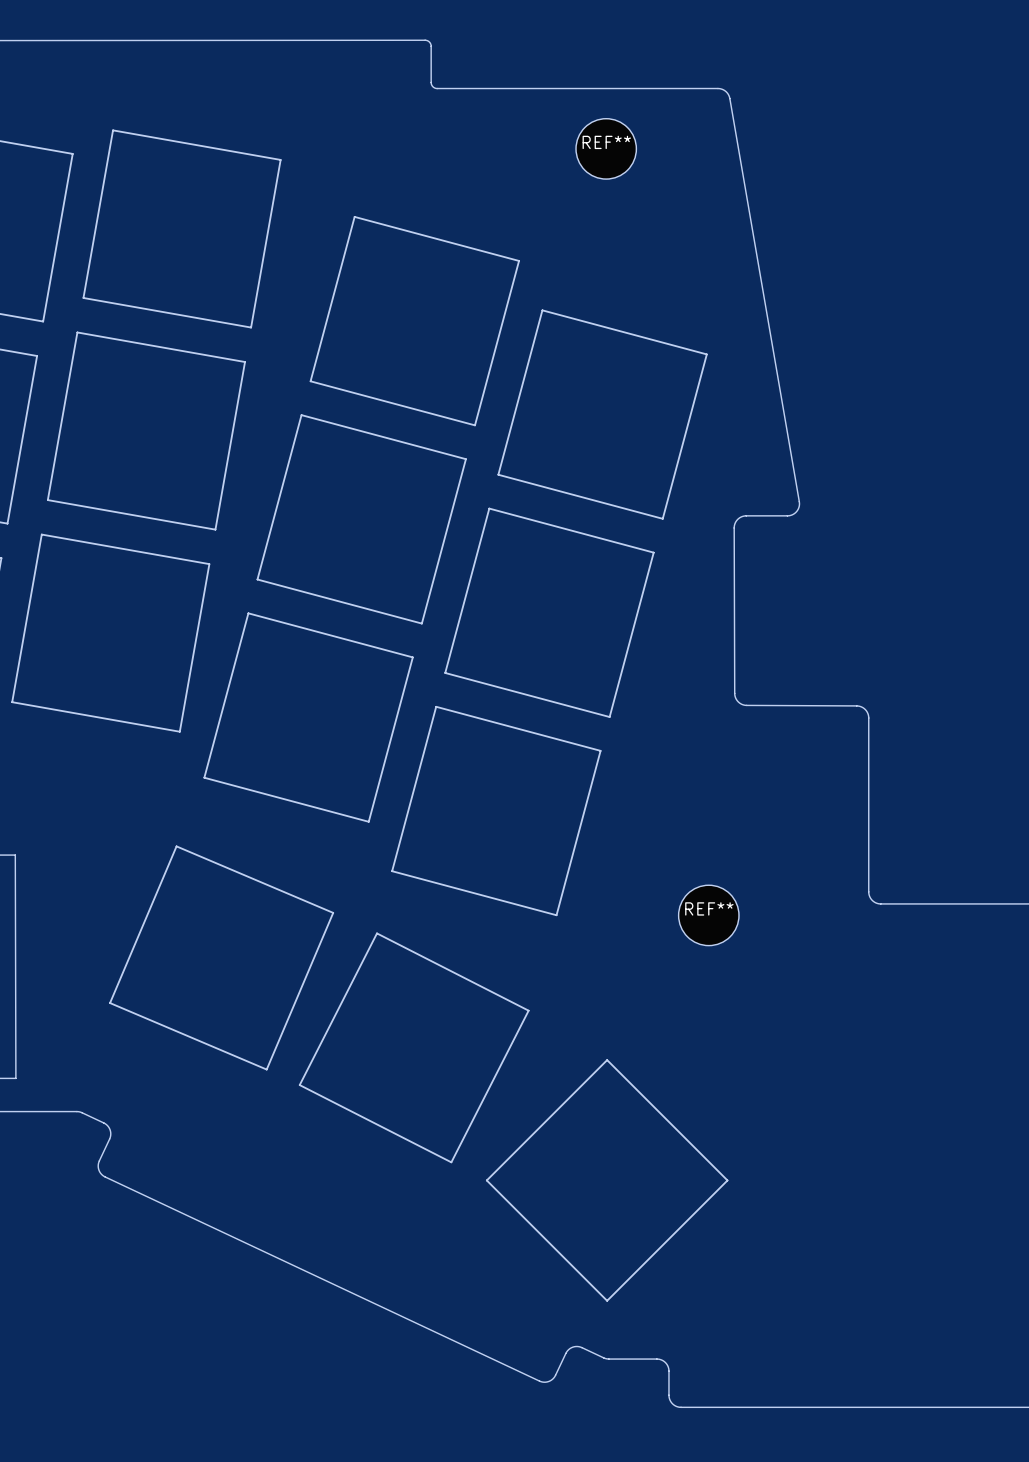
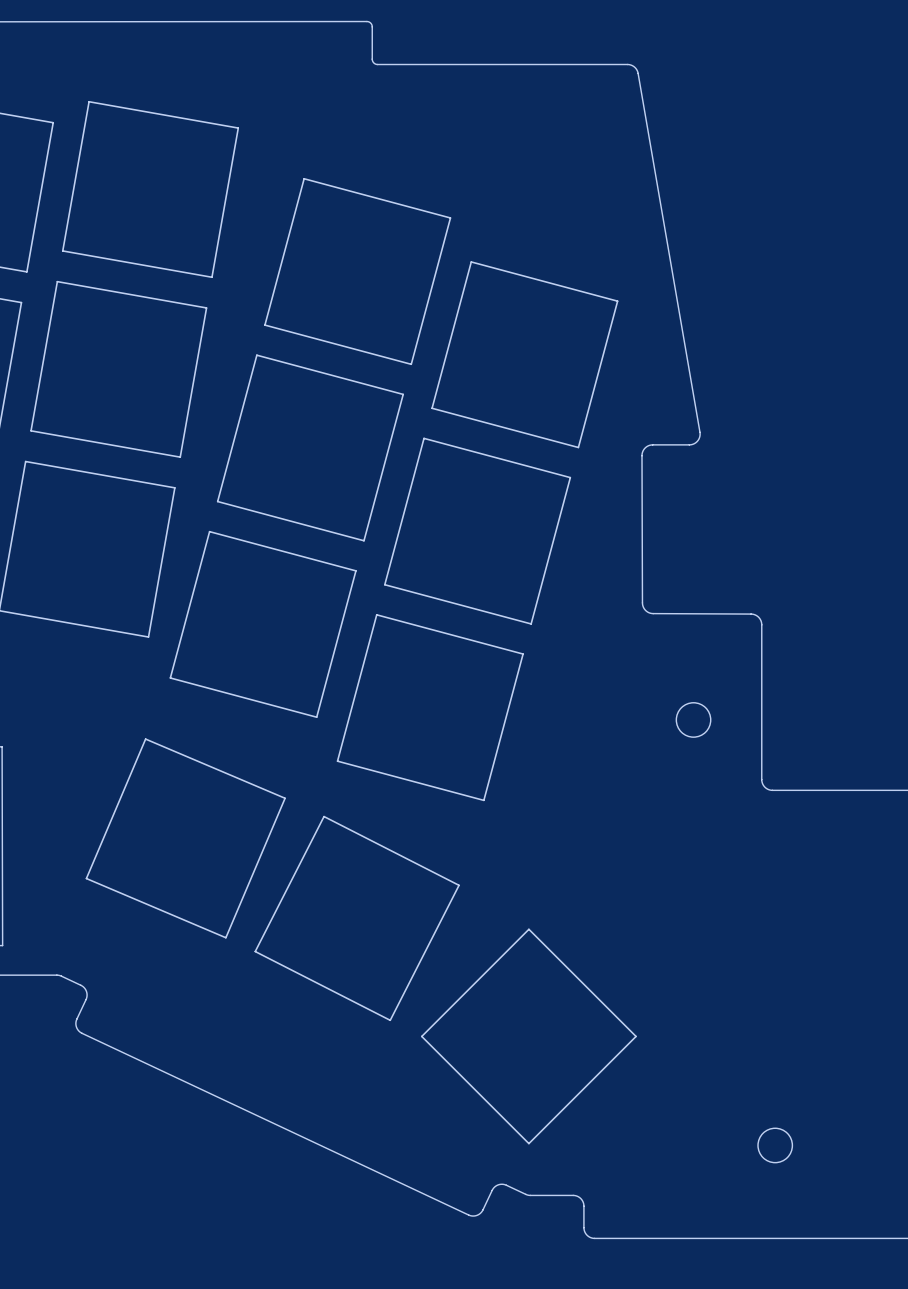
REF**: (606, 148) -> none
drawing: none -> [676, 702, 711, 738]
REF**: (708, 915) -> none
drawing: none -> [757, 1128, 793, 1163]

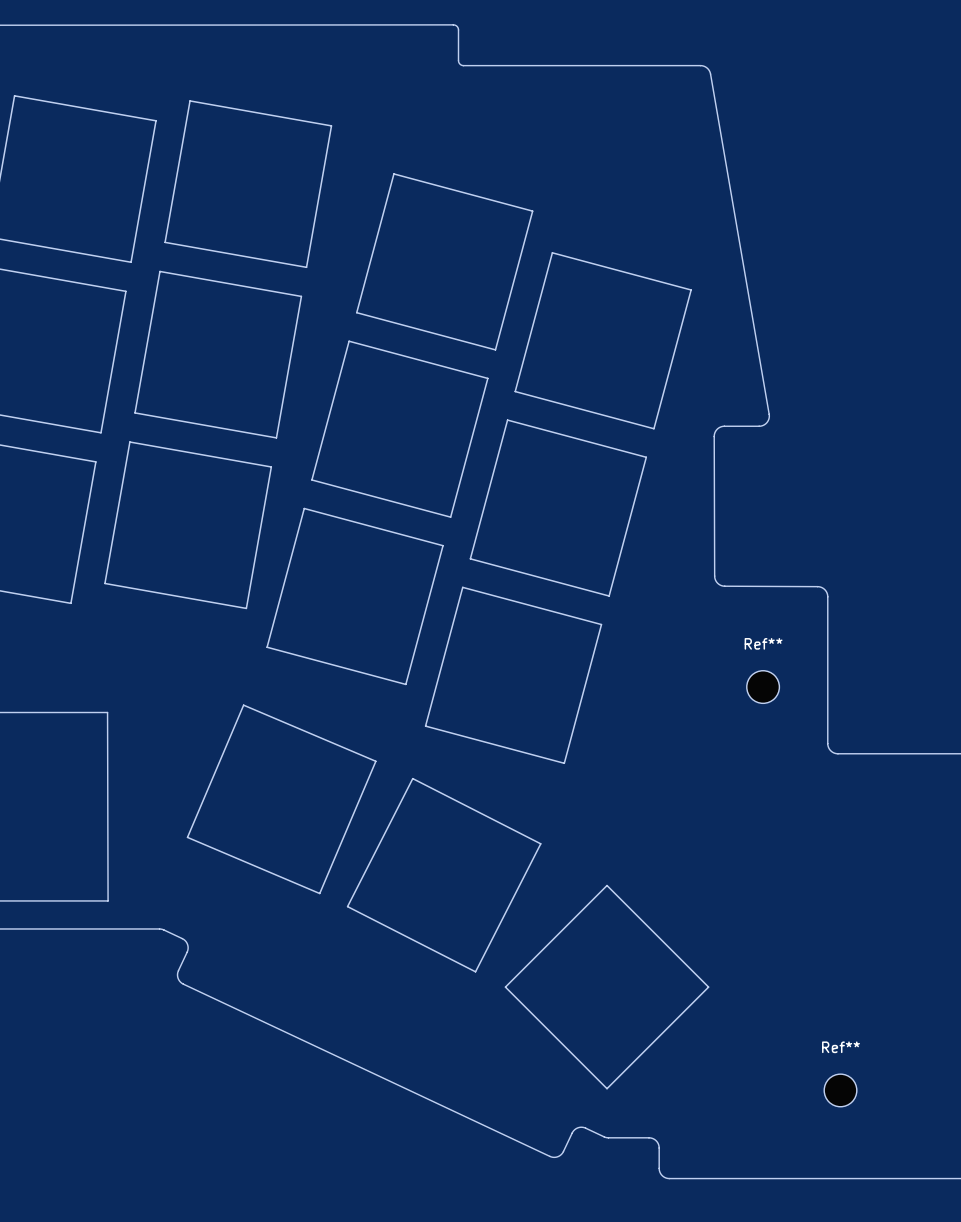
drawing: [676, 702, 711, 738] -> none
Ref**: none -> (763, 687)
drawing: [757, 1128, 793, 1163] -> none
Ref**: none -> (840, 1090)

